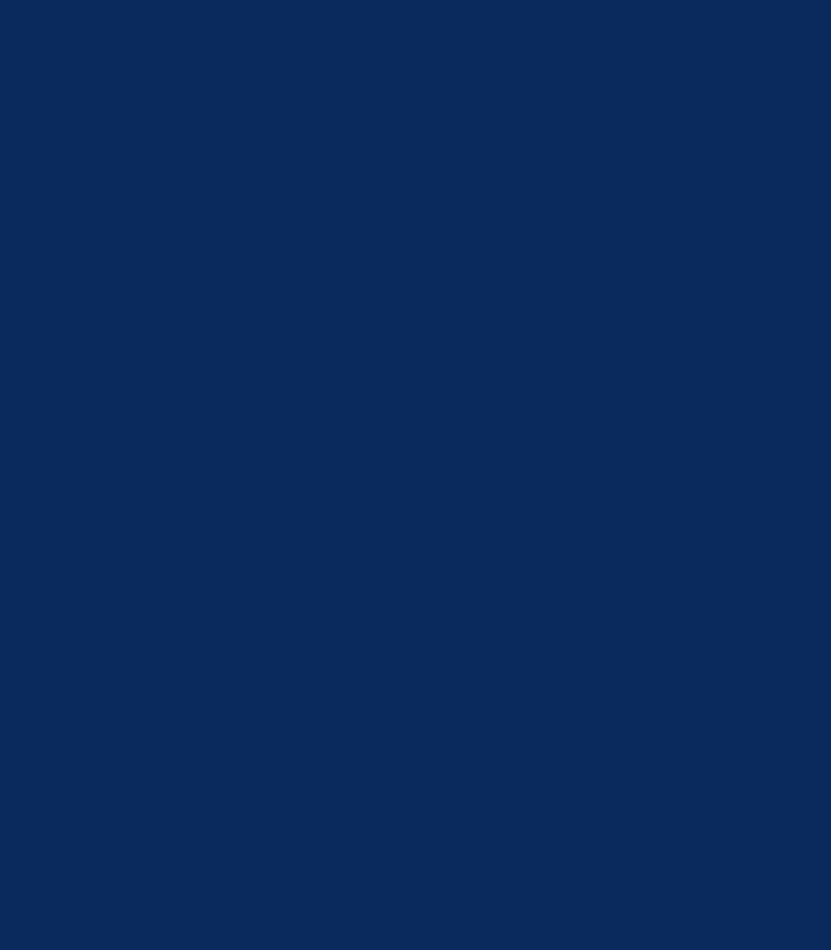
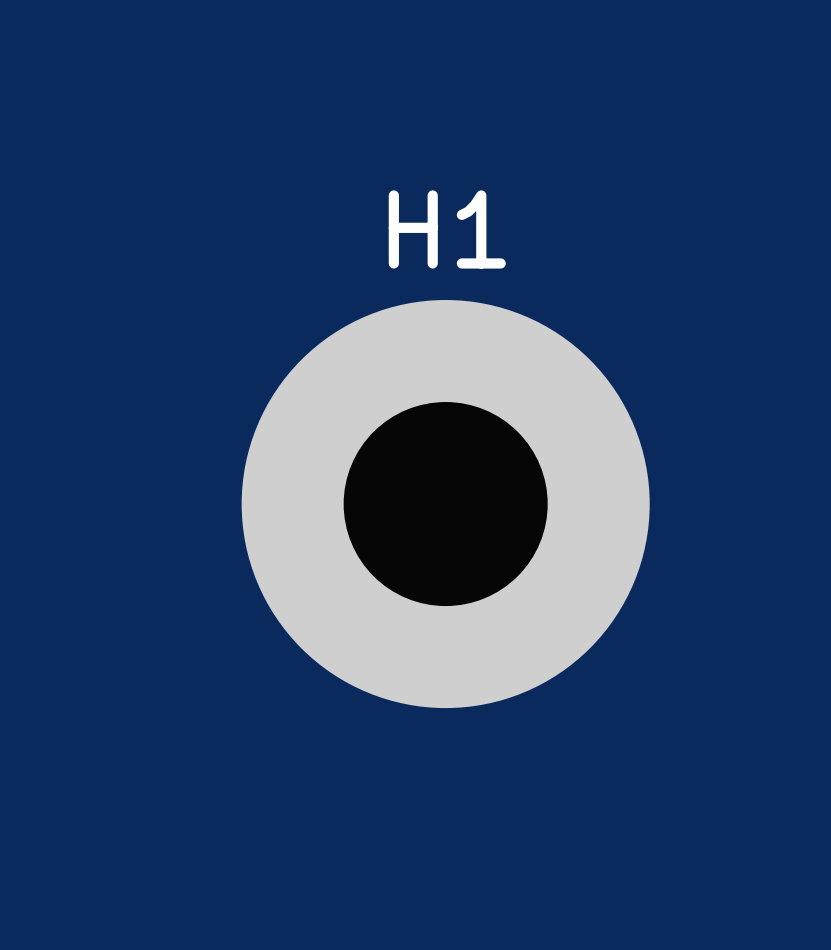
H1: none -> (445, 504)

